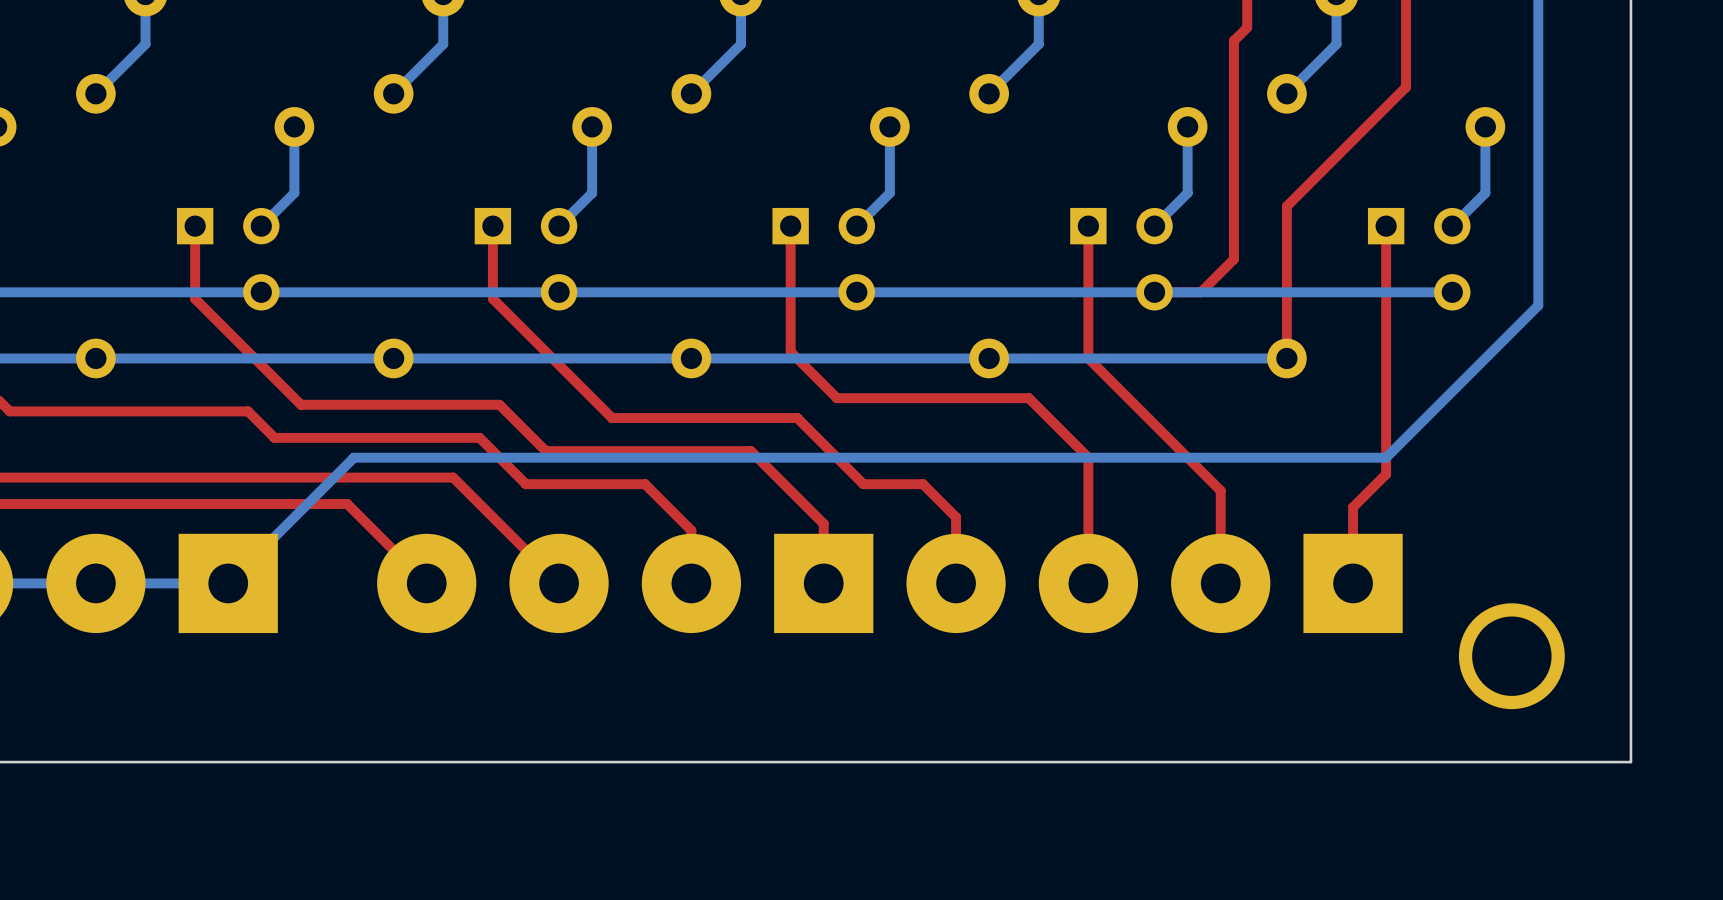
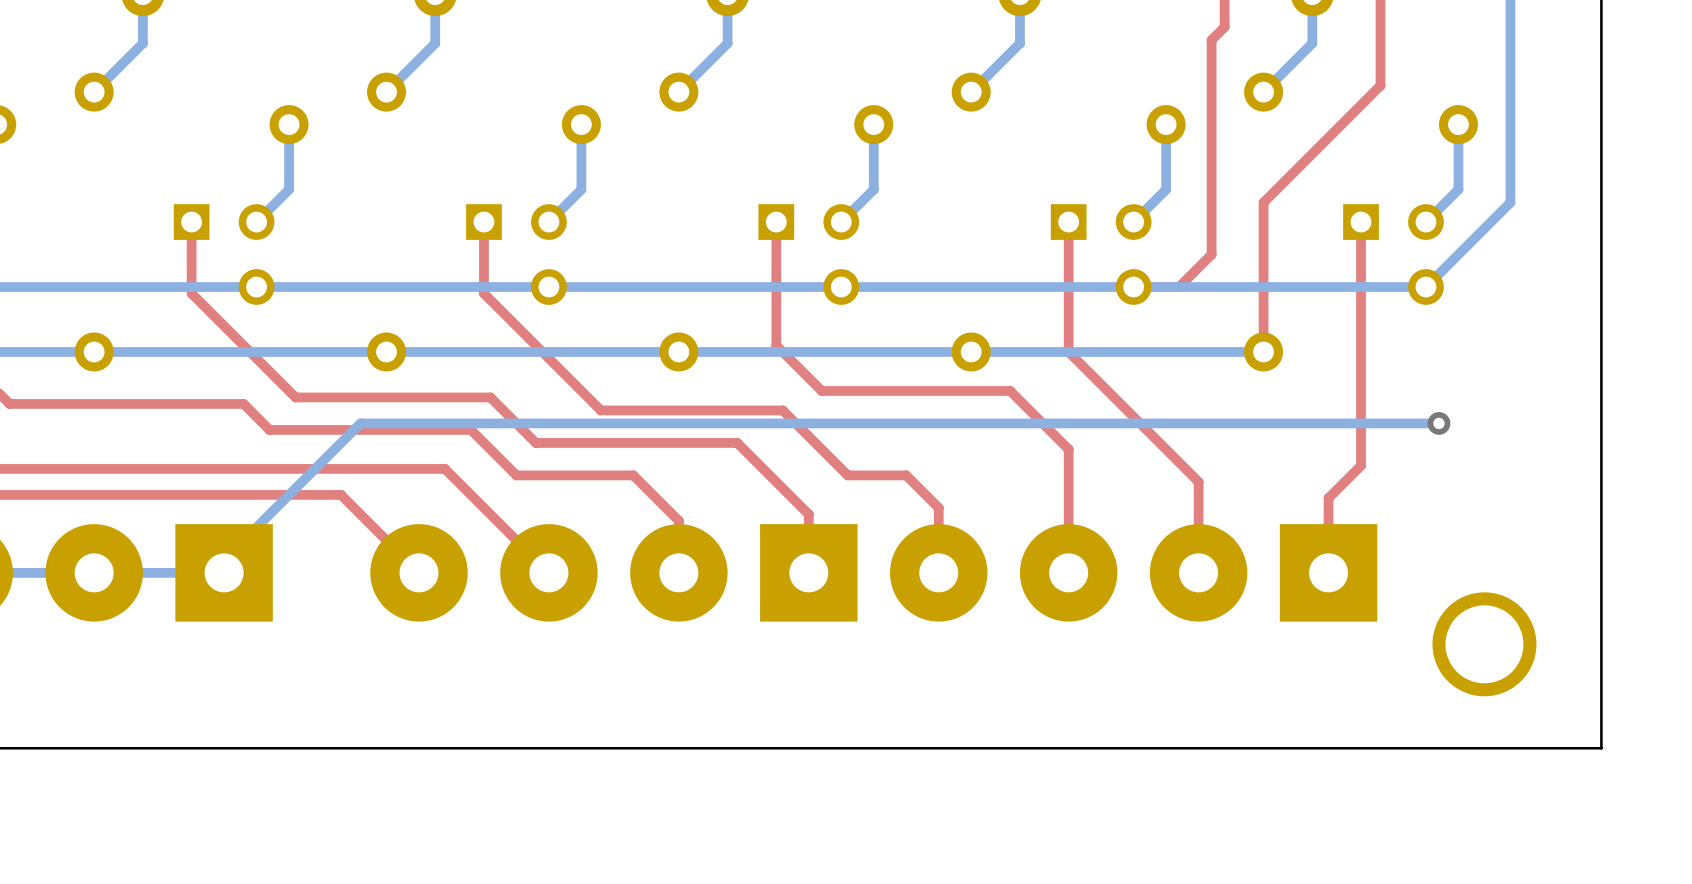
bottom track: (1538, 206) (1538, 305) (1386, 457) (353, 457) (228, 583) -> (1438, 423) (360, 423) (224, 559) (224, 572)
bottom track: none -> (1510, 202) (1425, 287)
via: none -> (1438, 423)

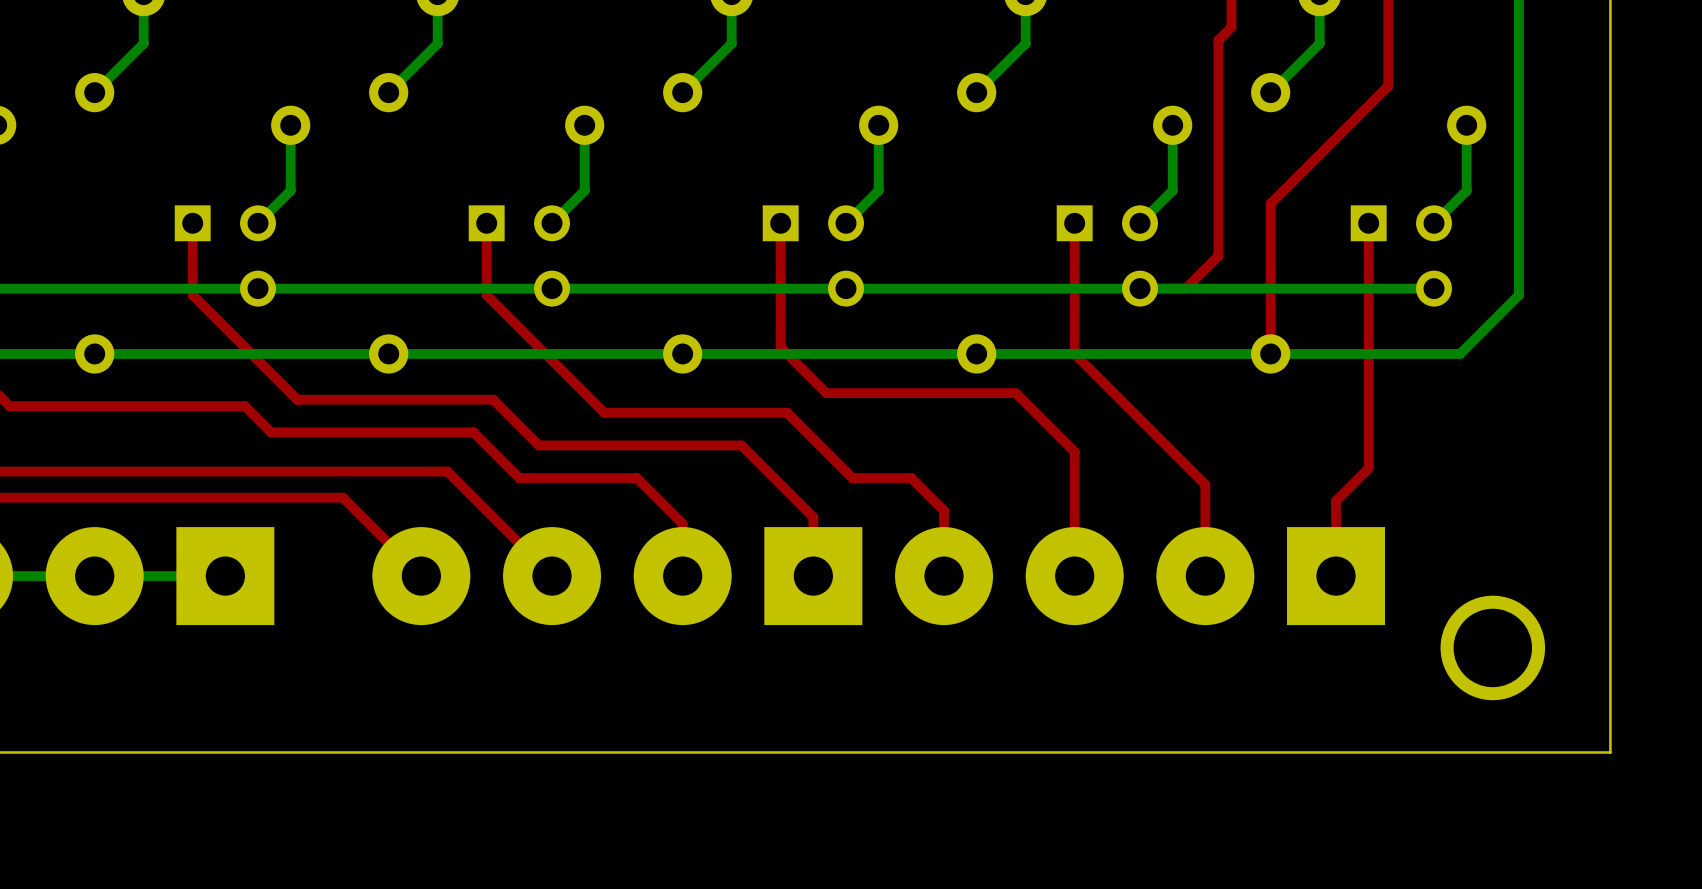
bottom track: (1510, 202) (1425, 287) -> (1518, 203) (1518, 295) (1460, 353) (1270, 353)
bottom track: (1438, 423) (360, 423) (224, 559) (224, 572) -> none
via: (1438, 423) -> none

